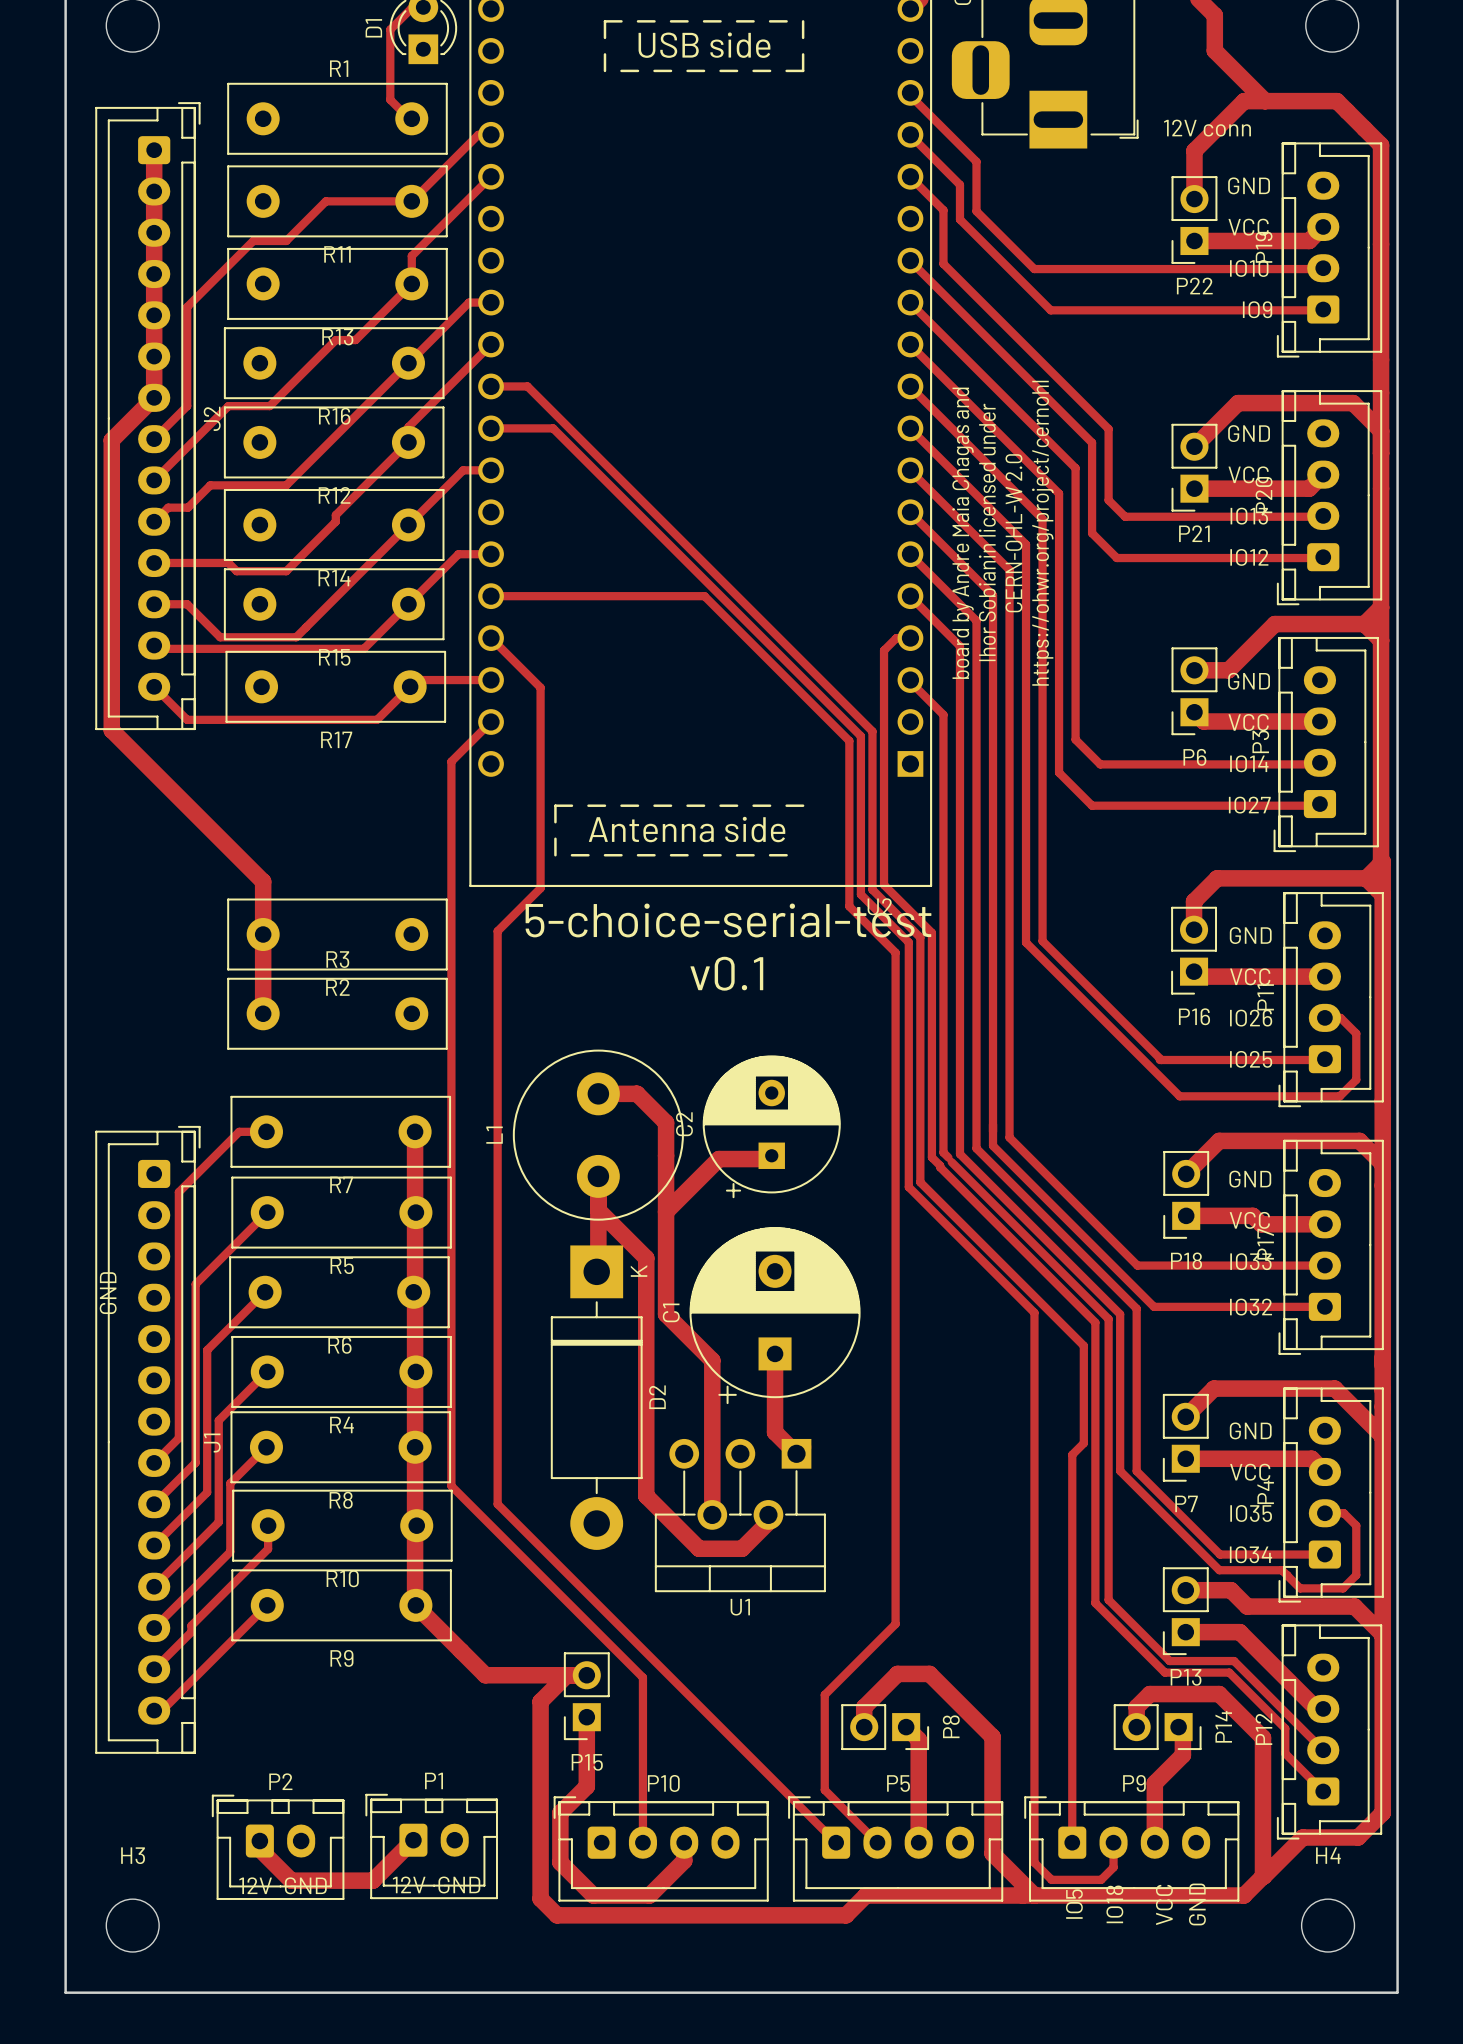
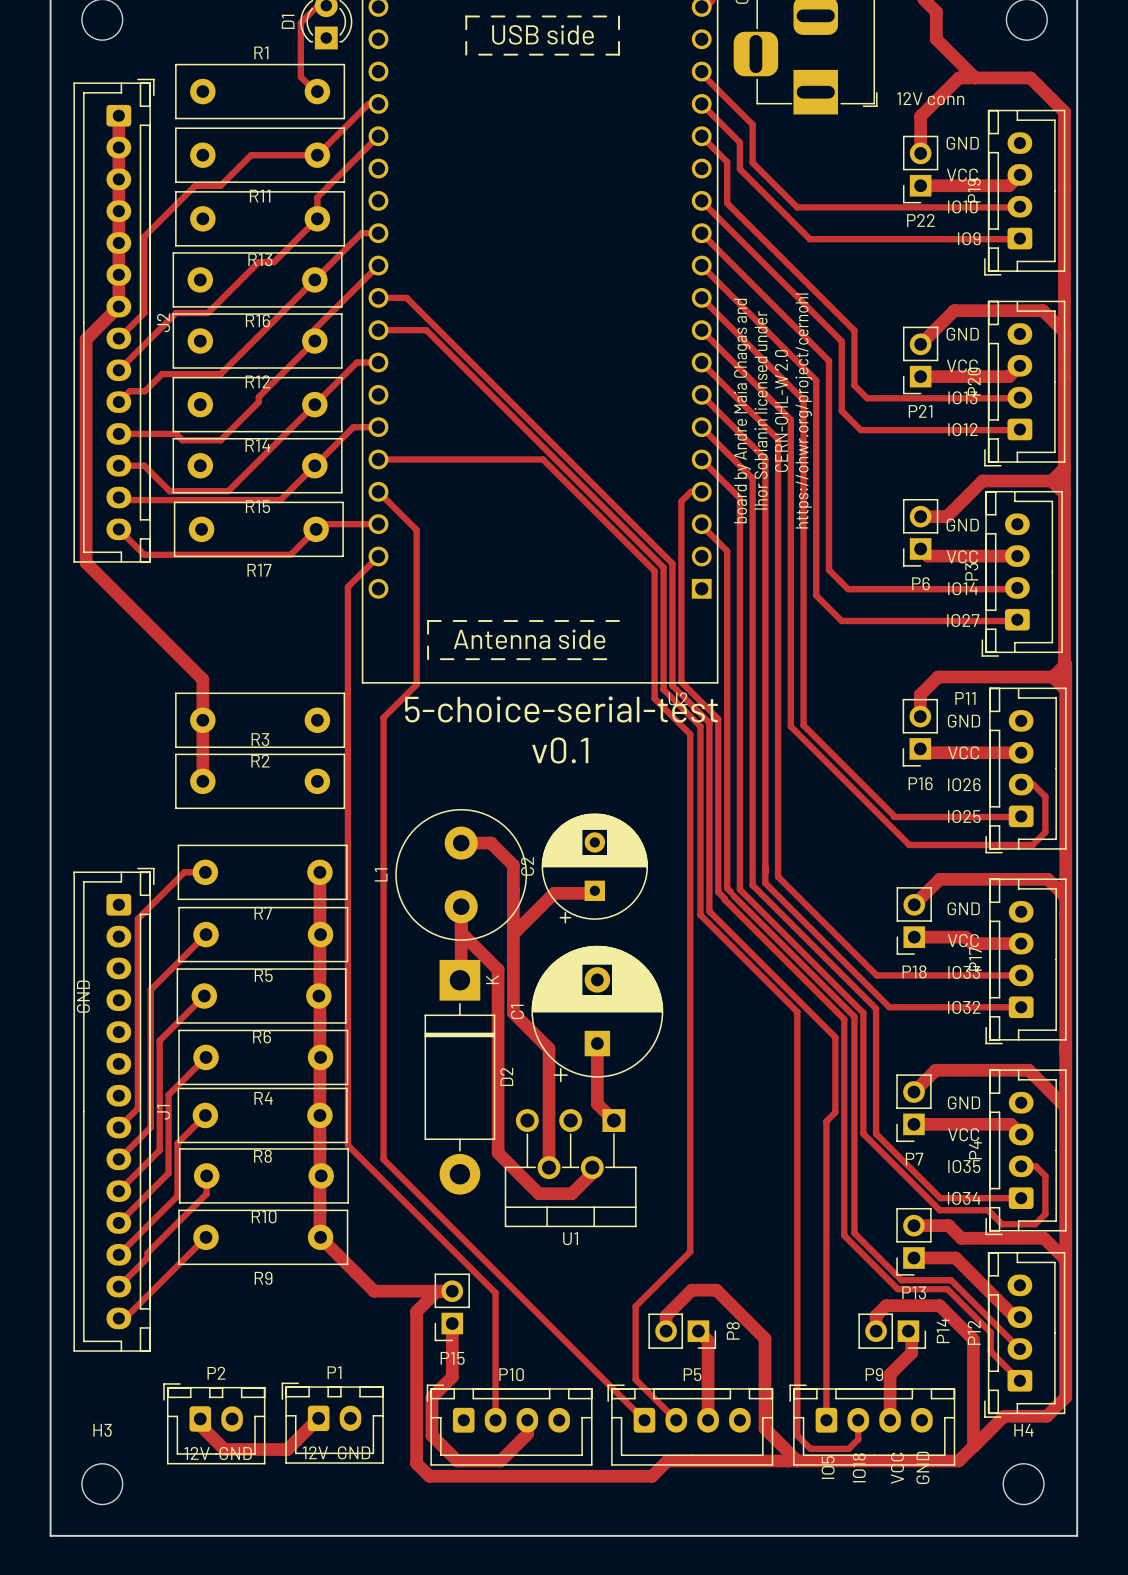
P11 name rotation: 0° (1265, 997) -> 90° clockwise (965, 698)
P11 name position: P11 (1265, 997) -> P11 (965, 698)

